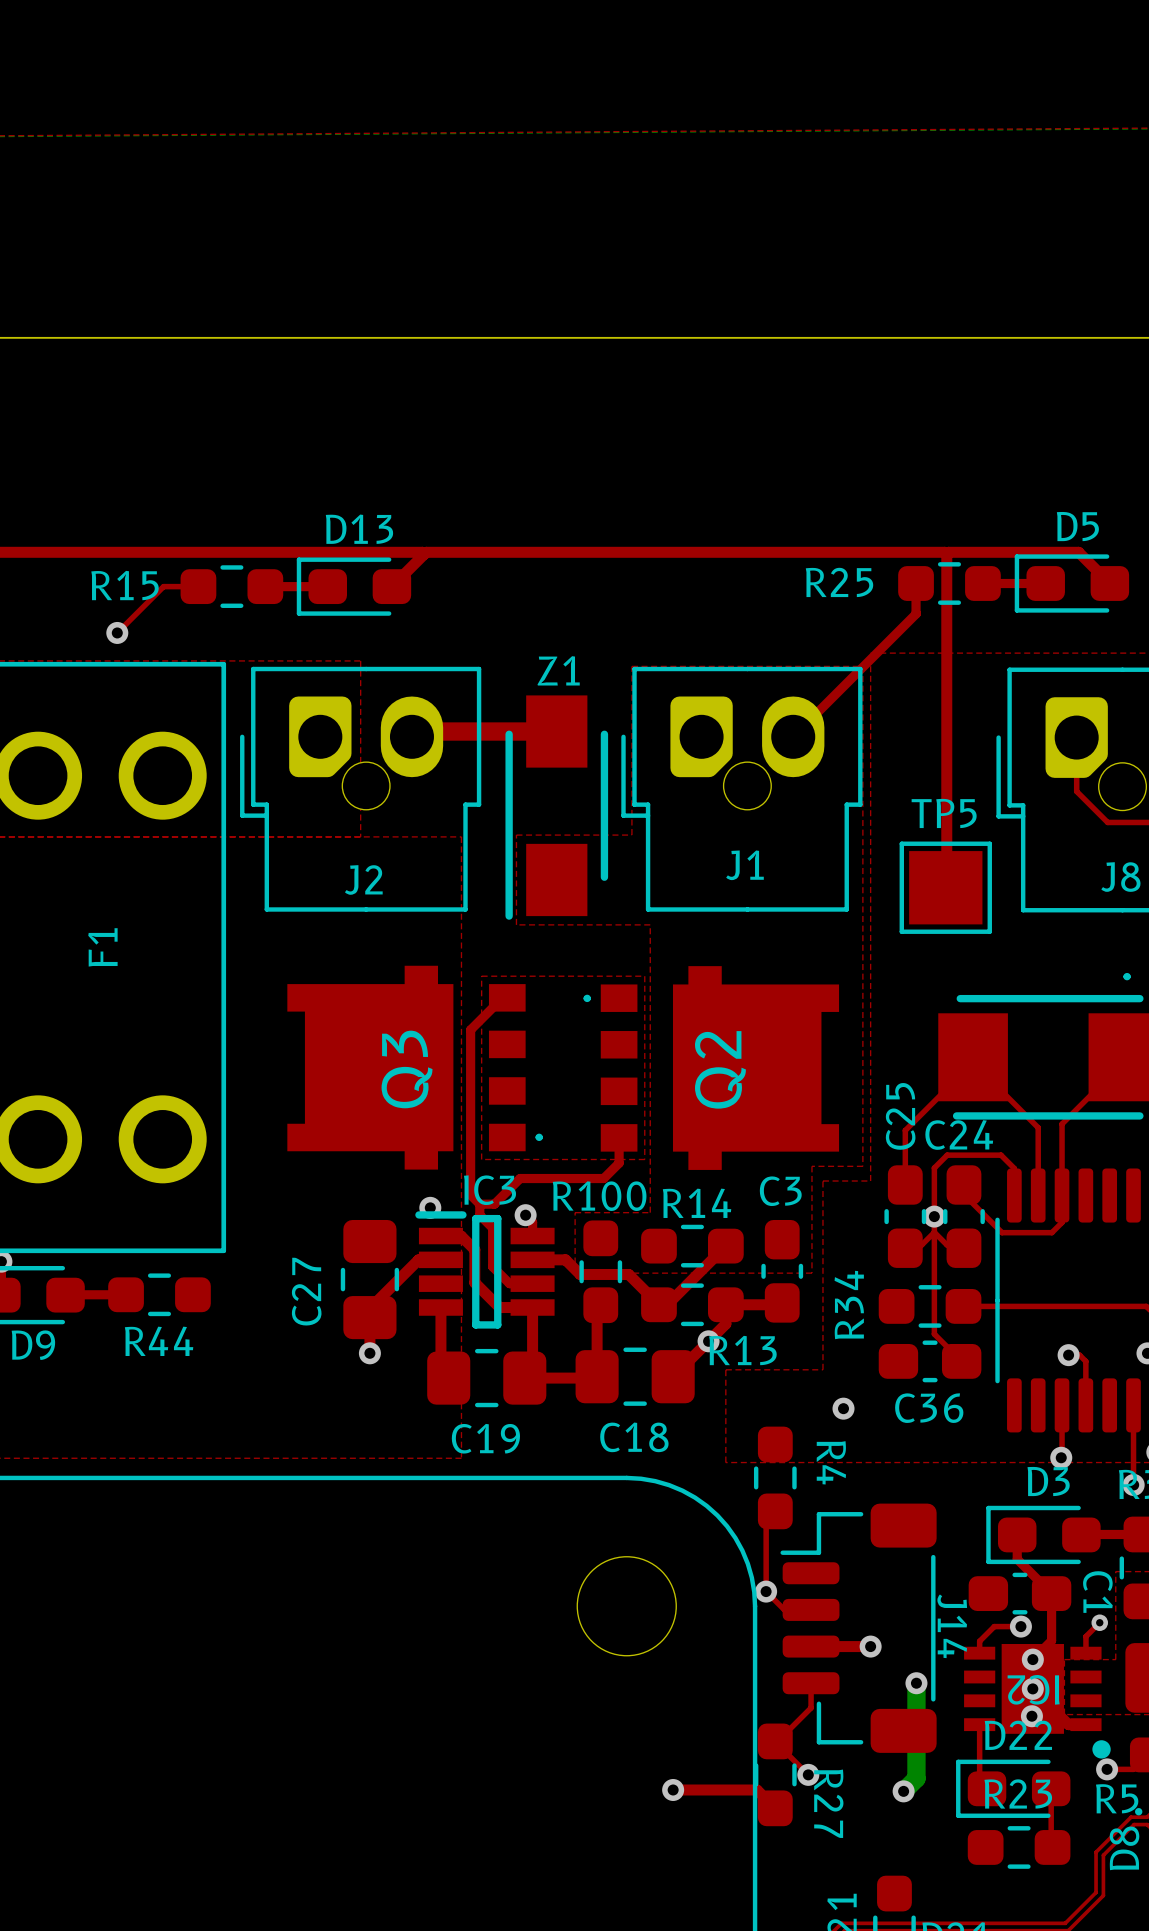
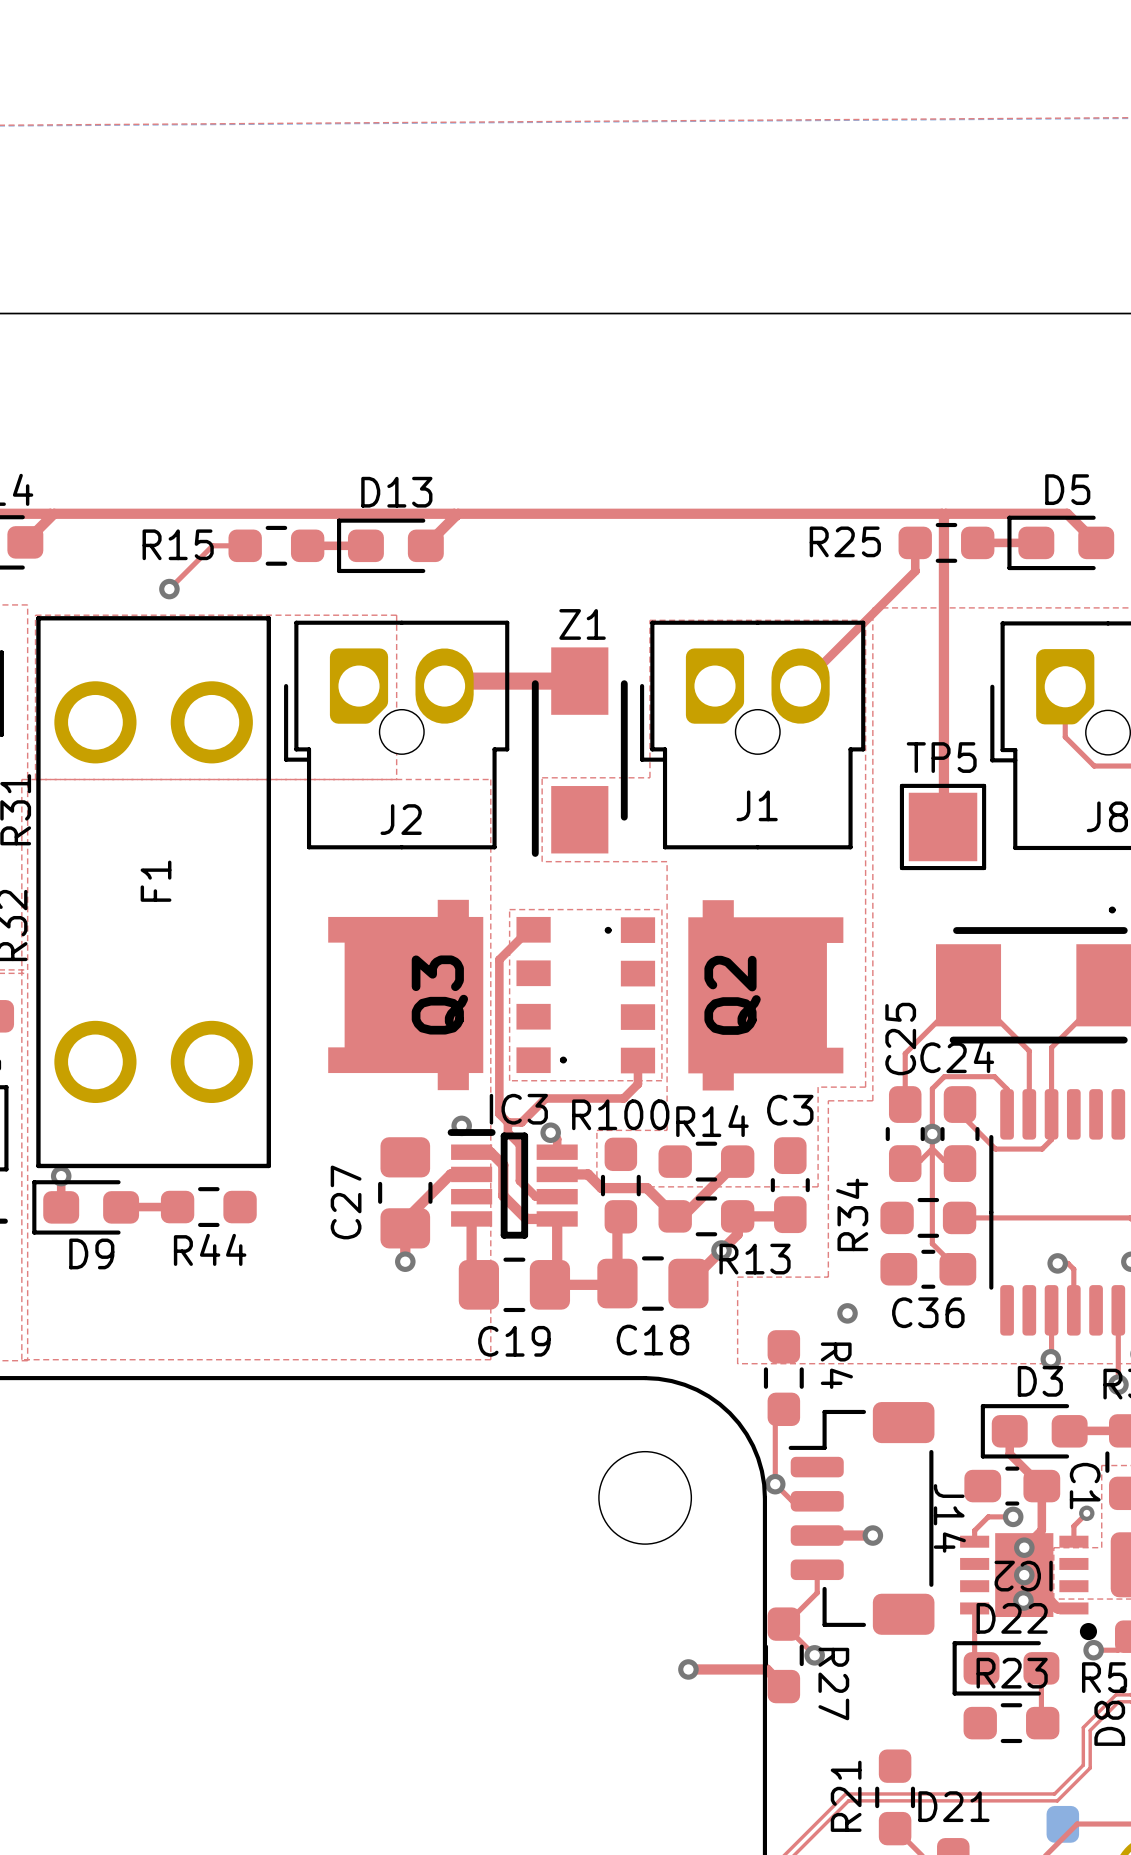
bottom track: (916, 1683) (916, 1778) (903, 1791) -> none
via: (916, 1683) -> none
via: (903, 1791) -> none

